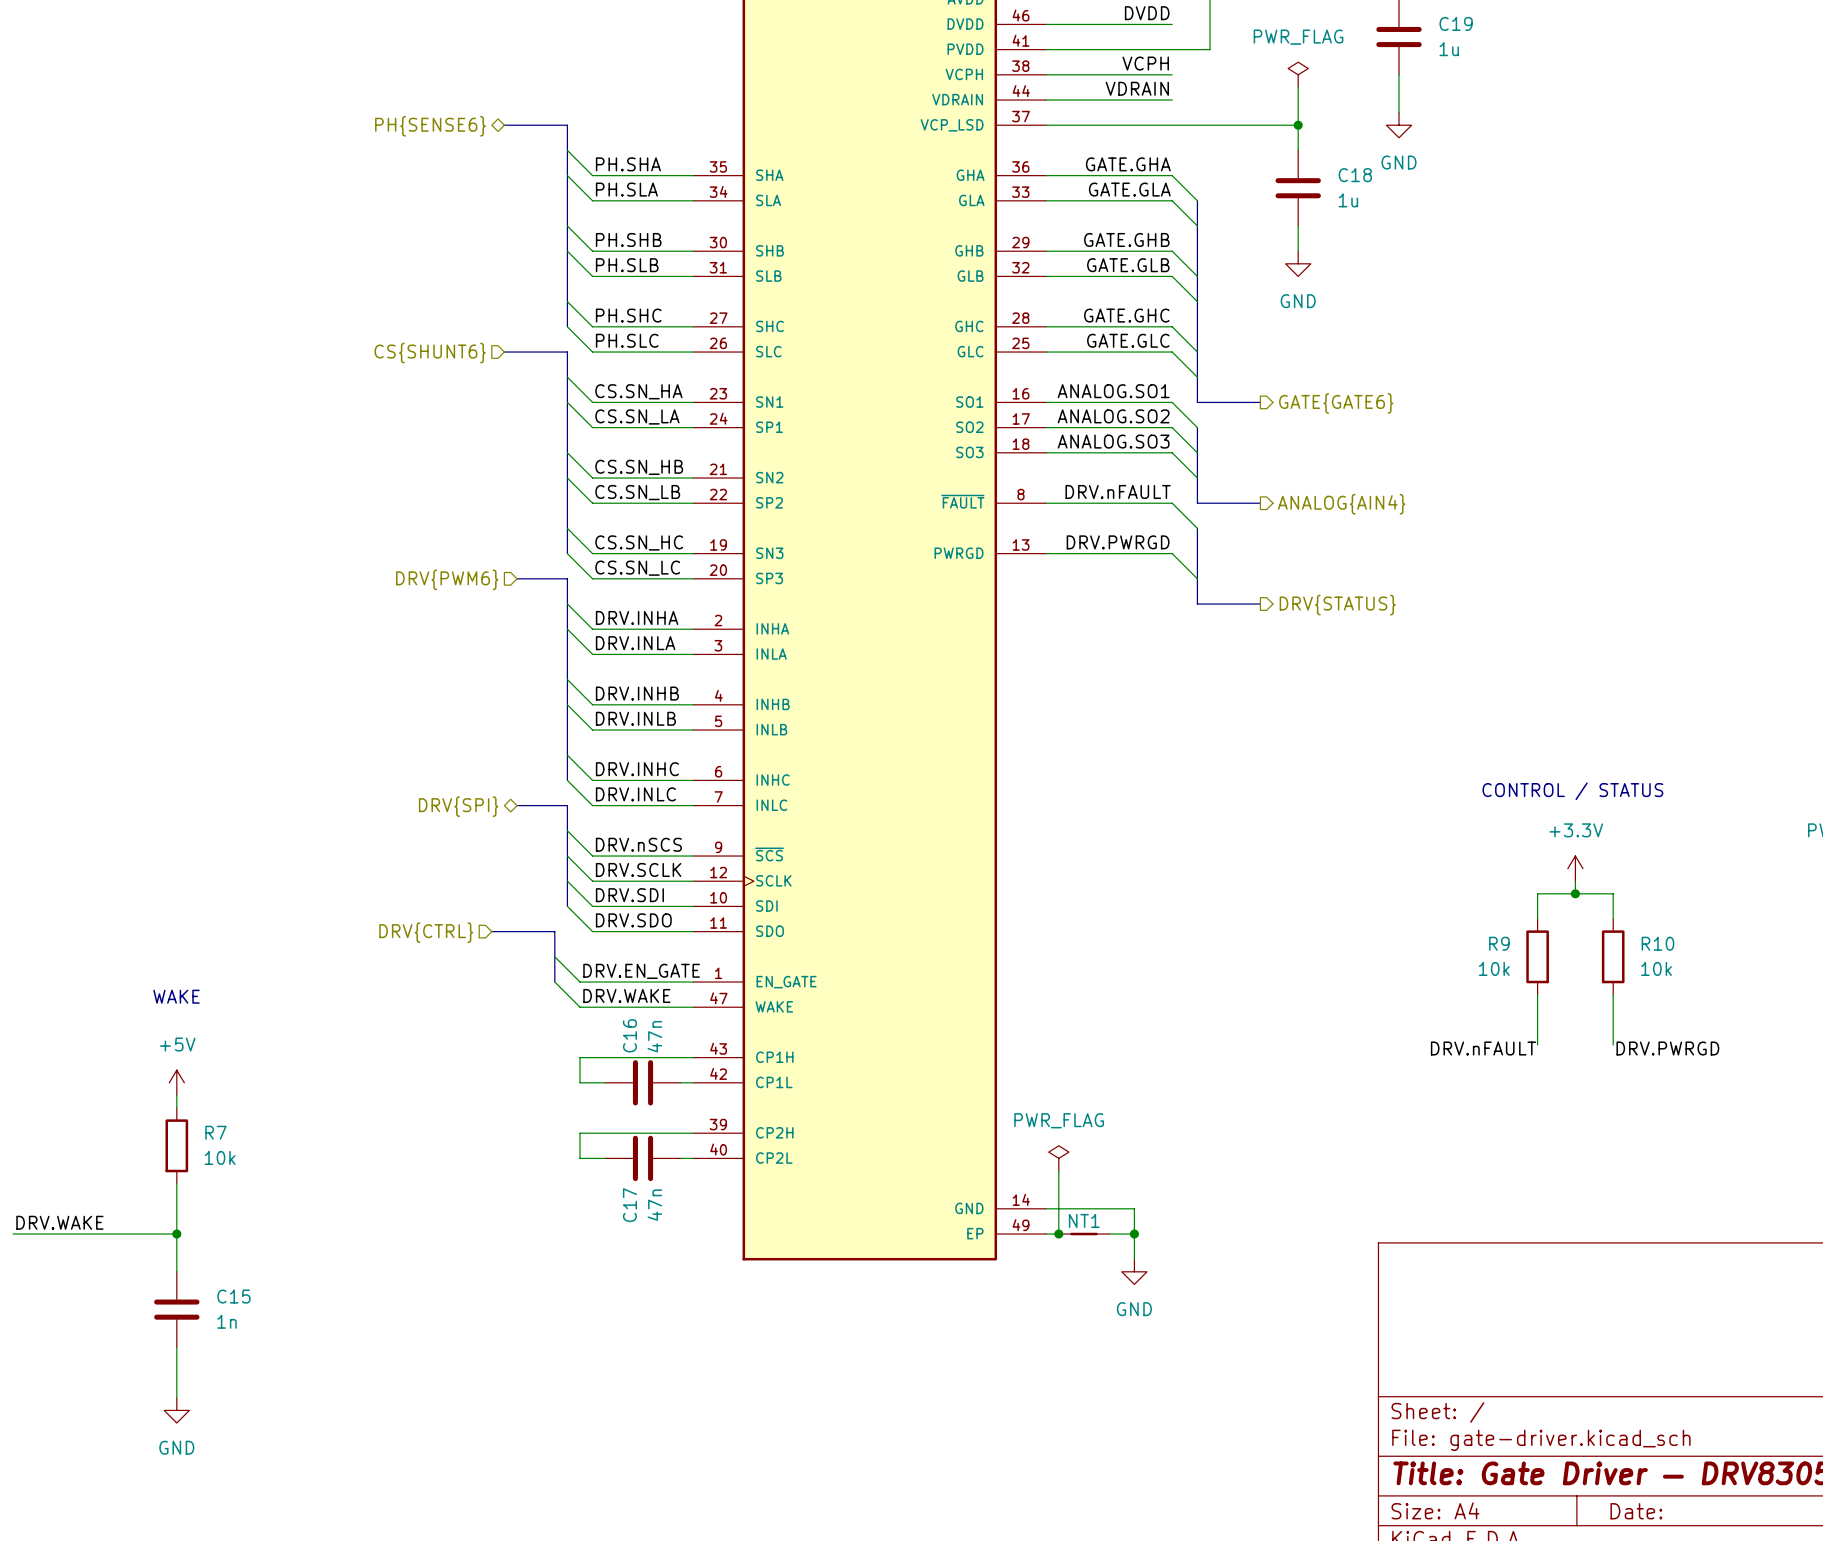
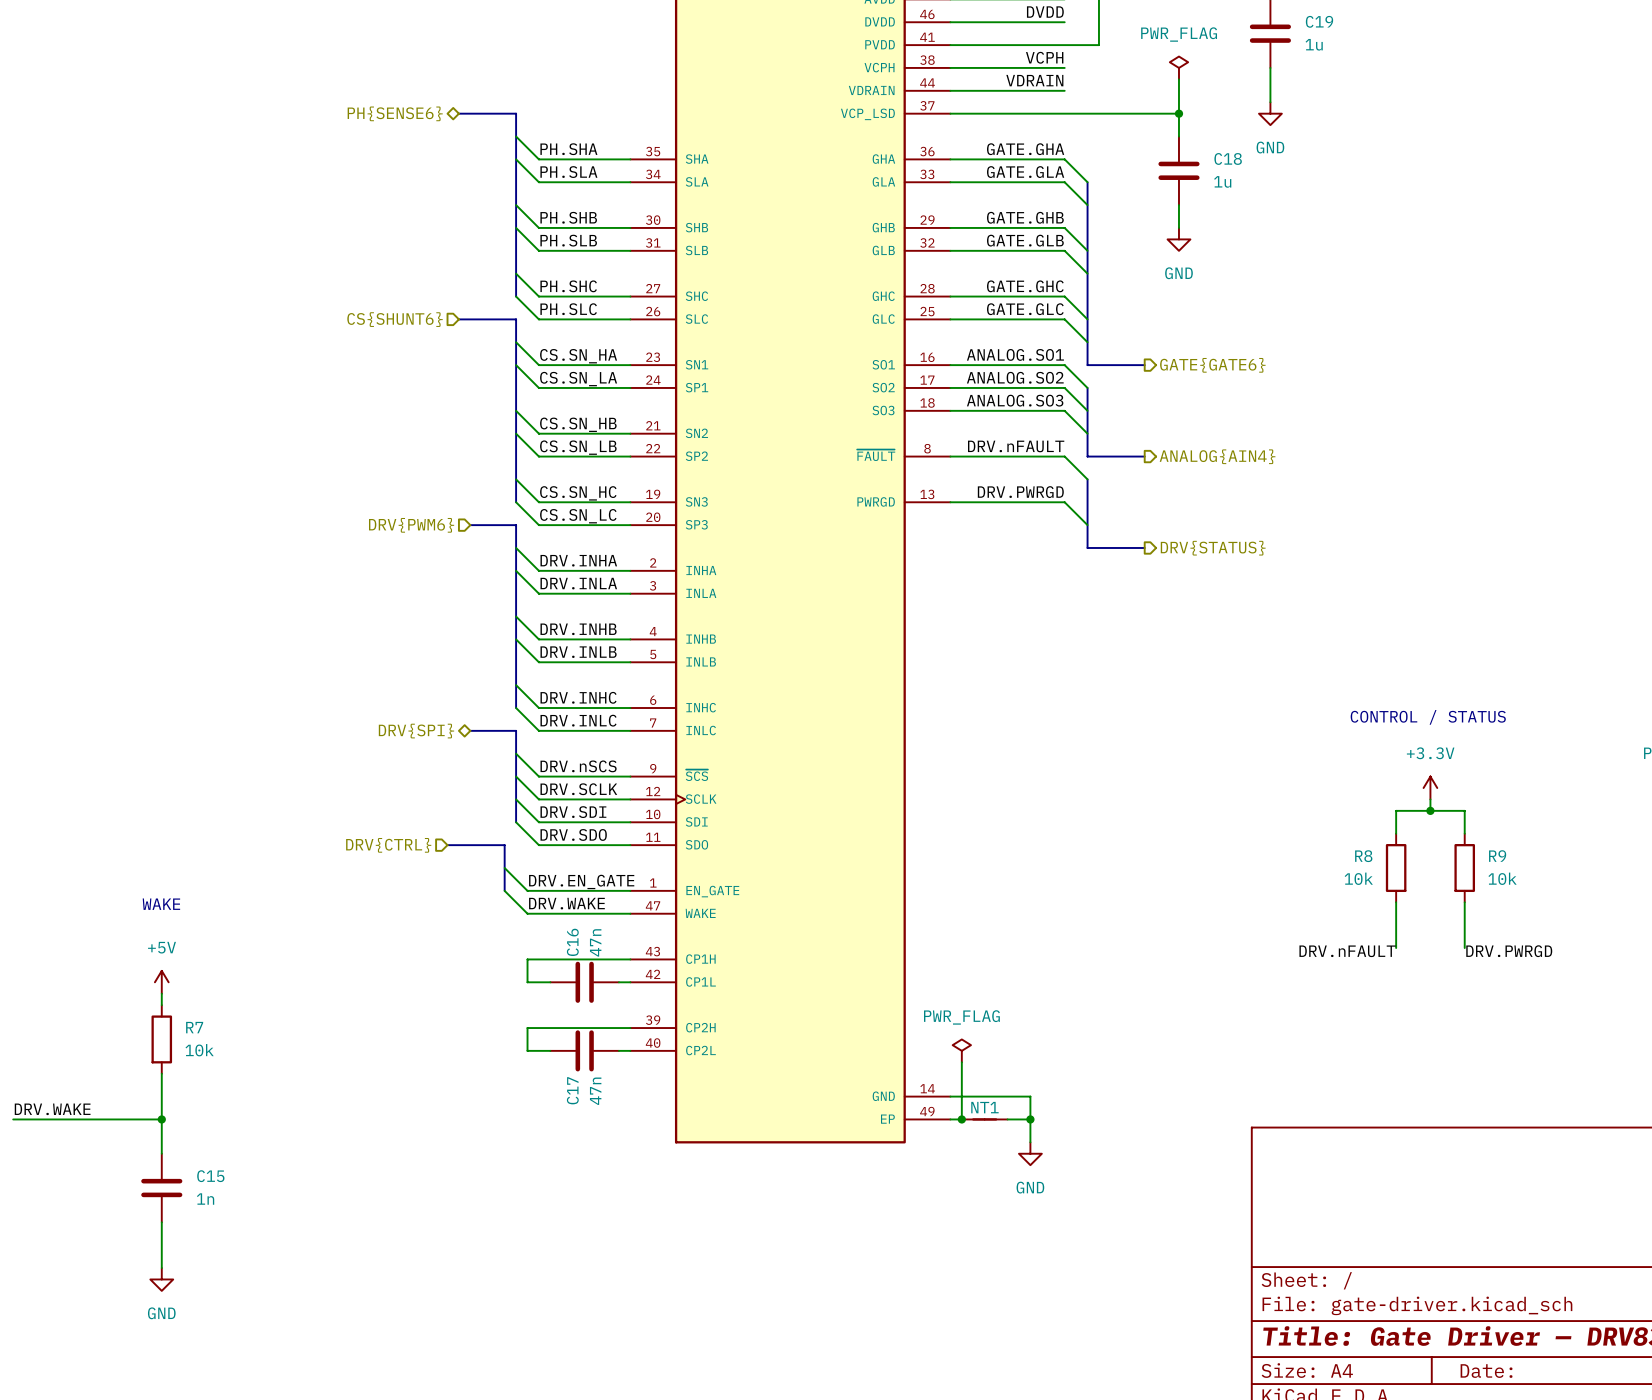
R9 name: R9 (1499, 943) -> R8 (1363, 856)
R10 name: R10 (1658, 943) -> R9 (1497, 856)

